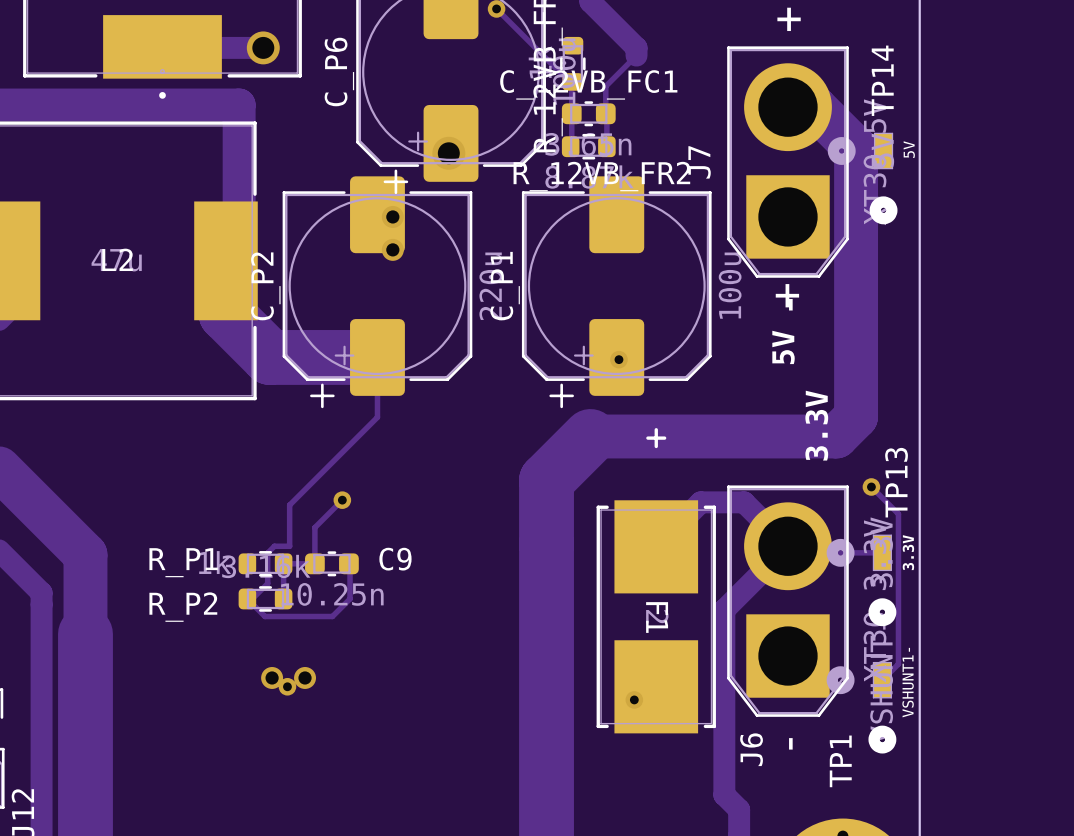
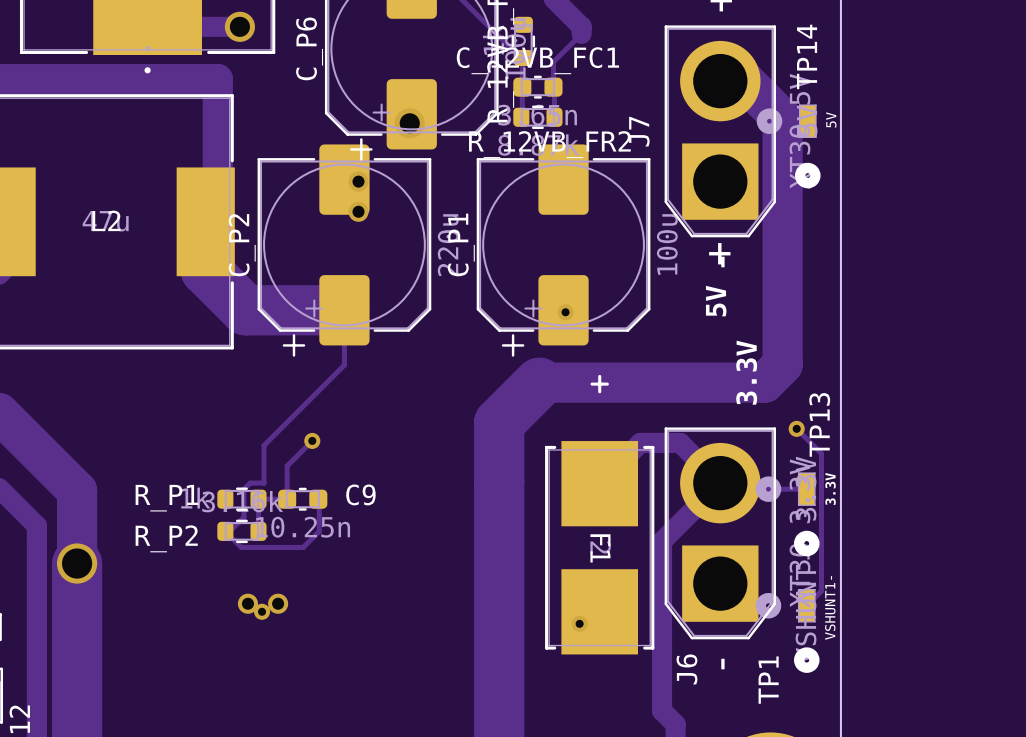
via: none -> (77, 563)

